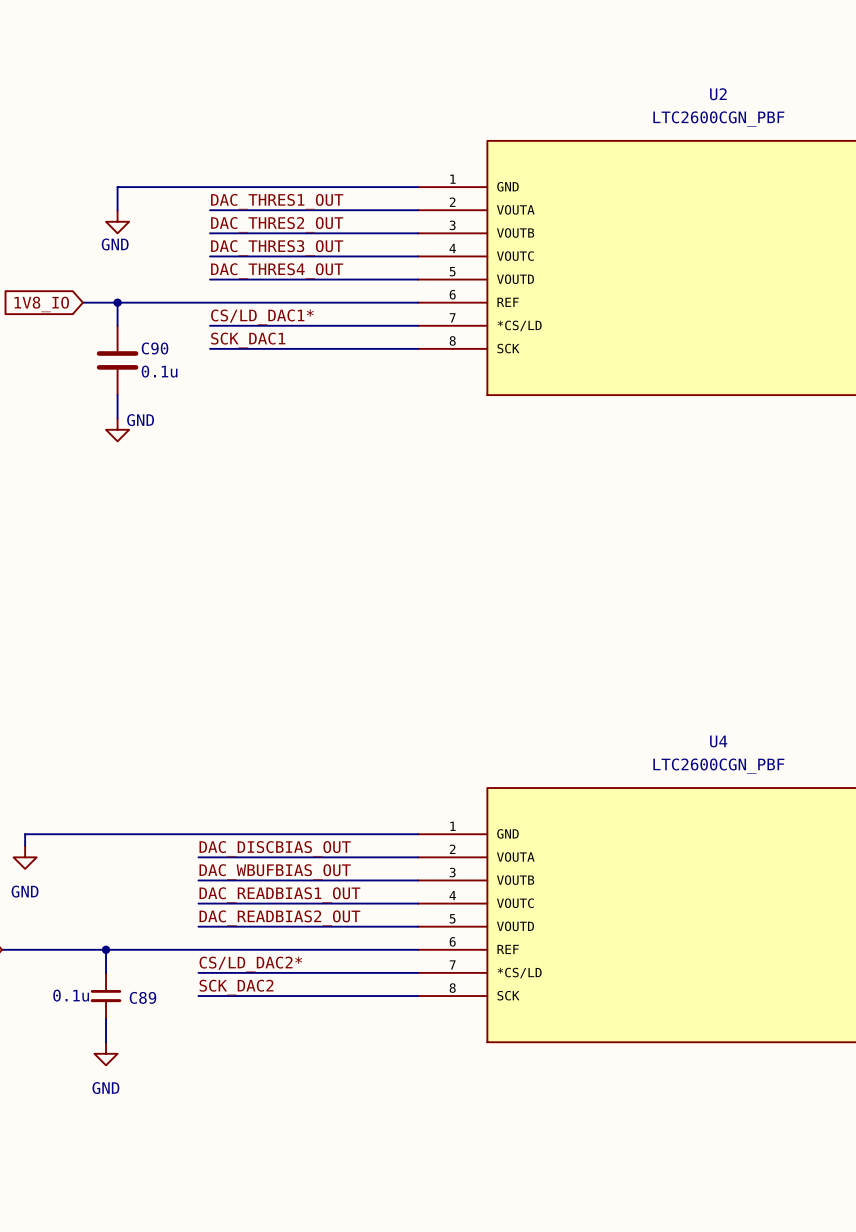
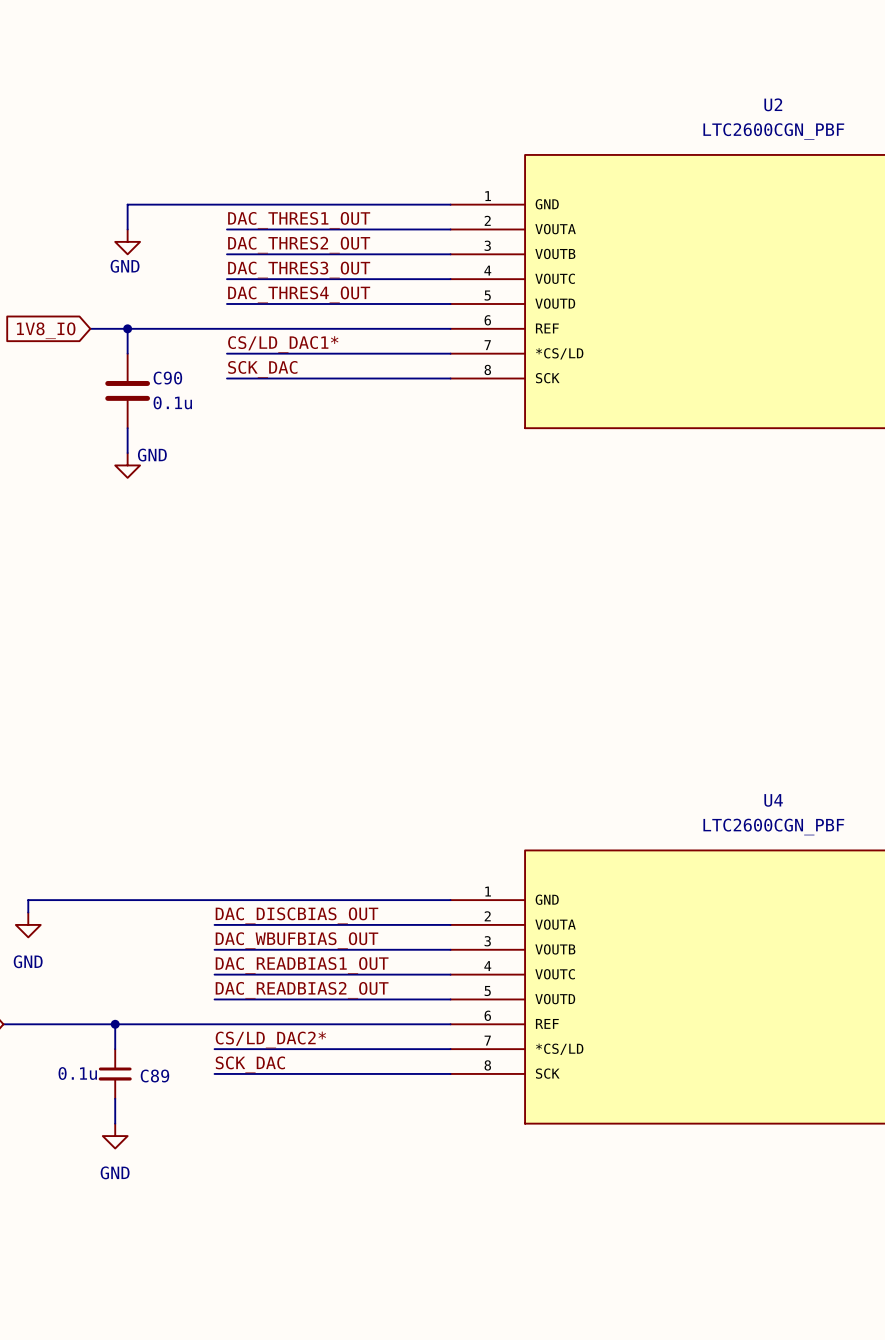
label: SCK_DAC1 (248, 340) -> SCK_DAC (262, 369)
label: SCK_DAC2 (236, 987) -> SCK_DAC (250, 1064)

